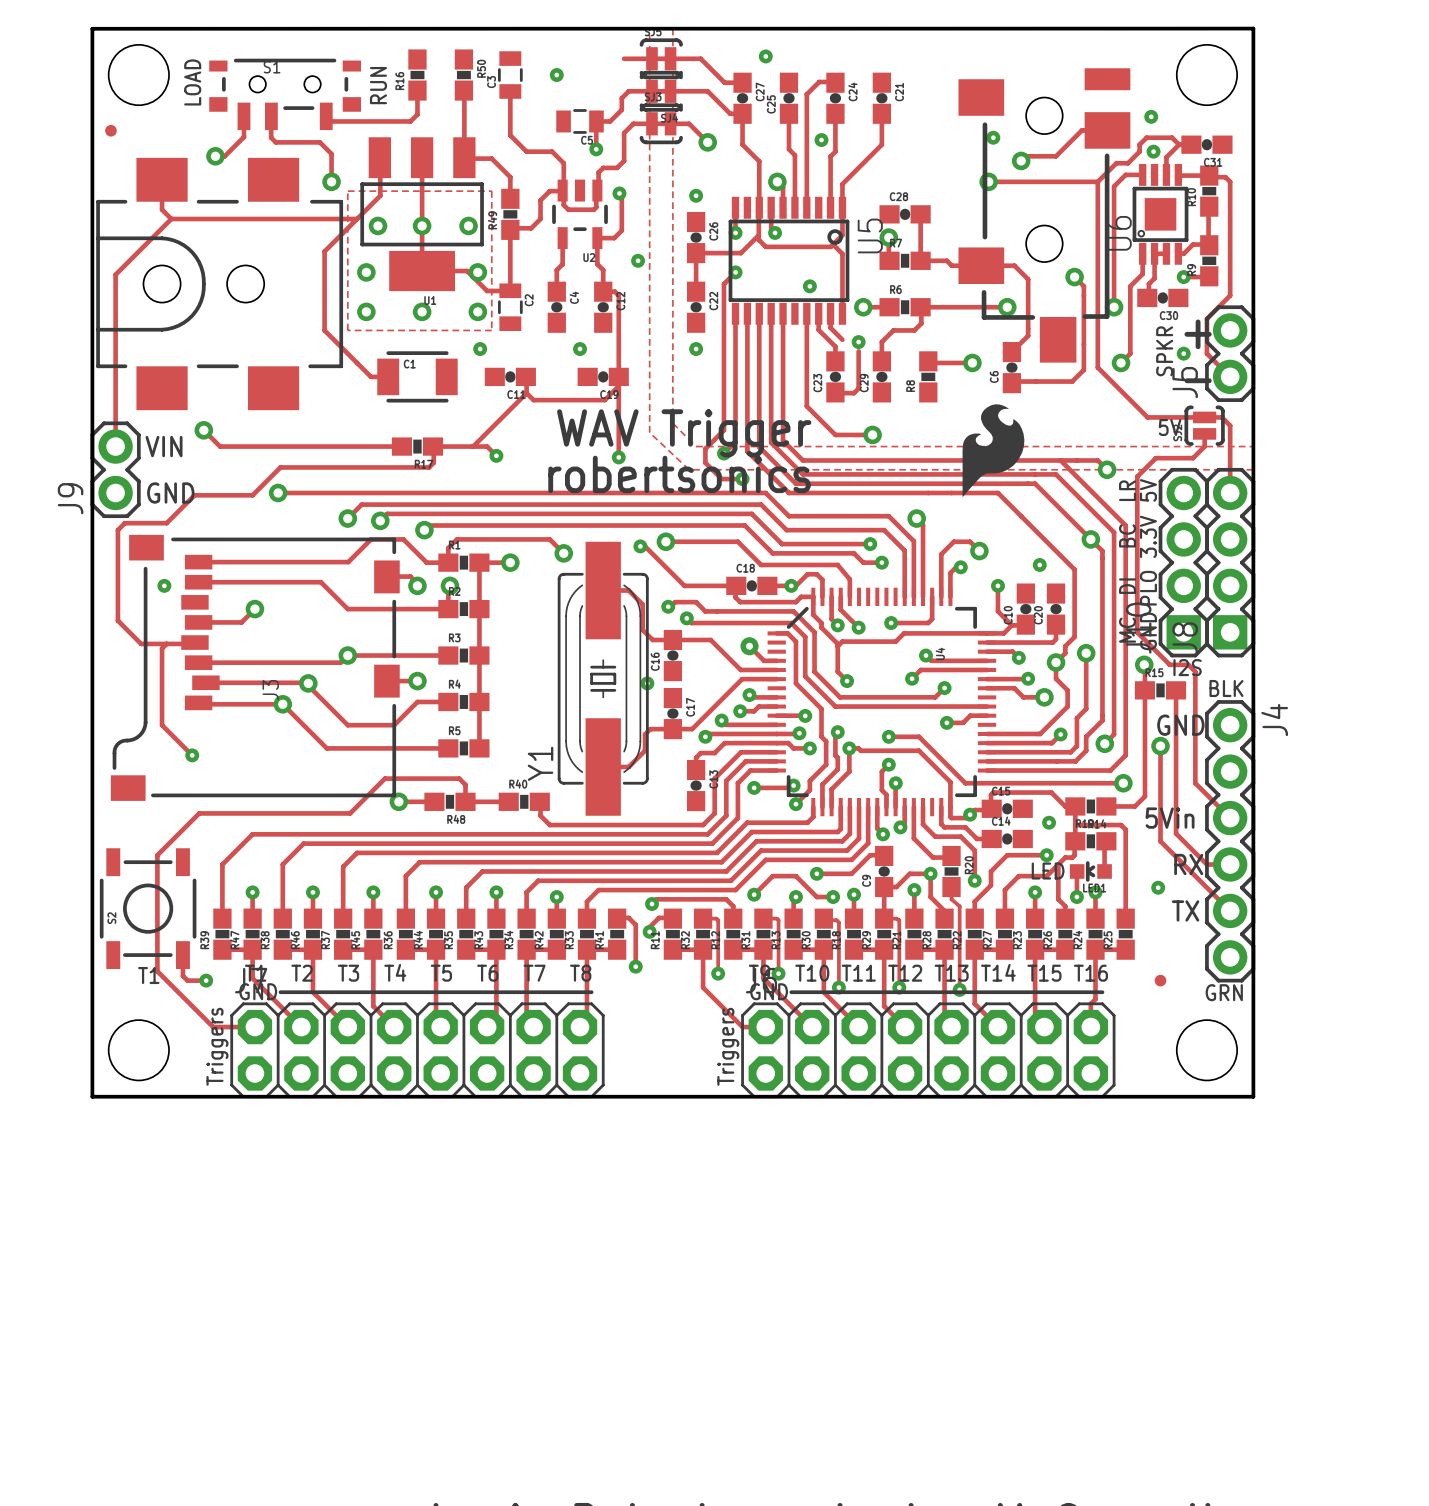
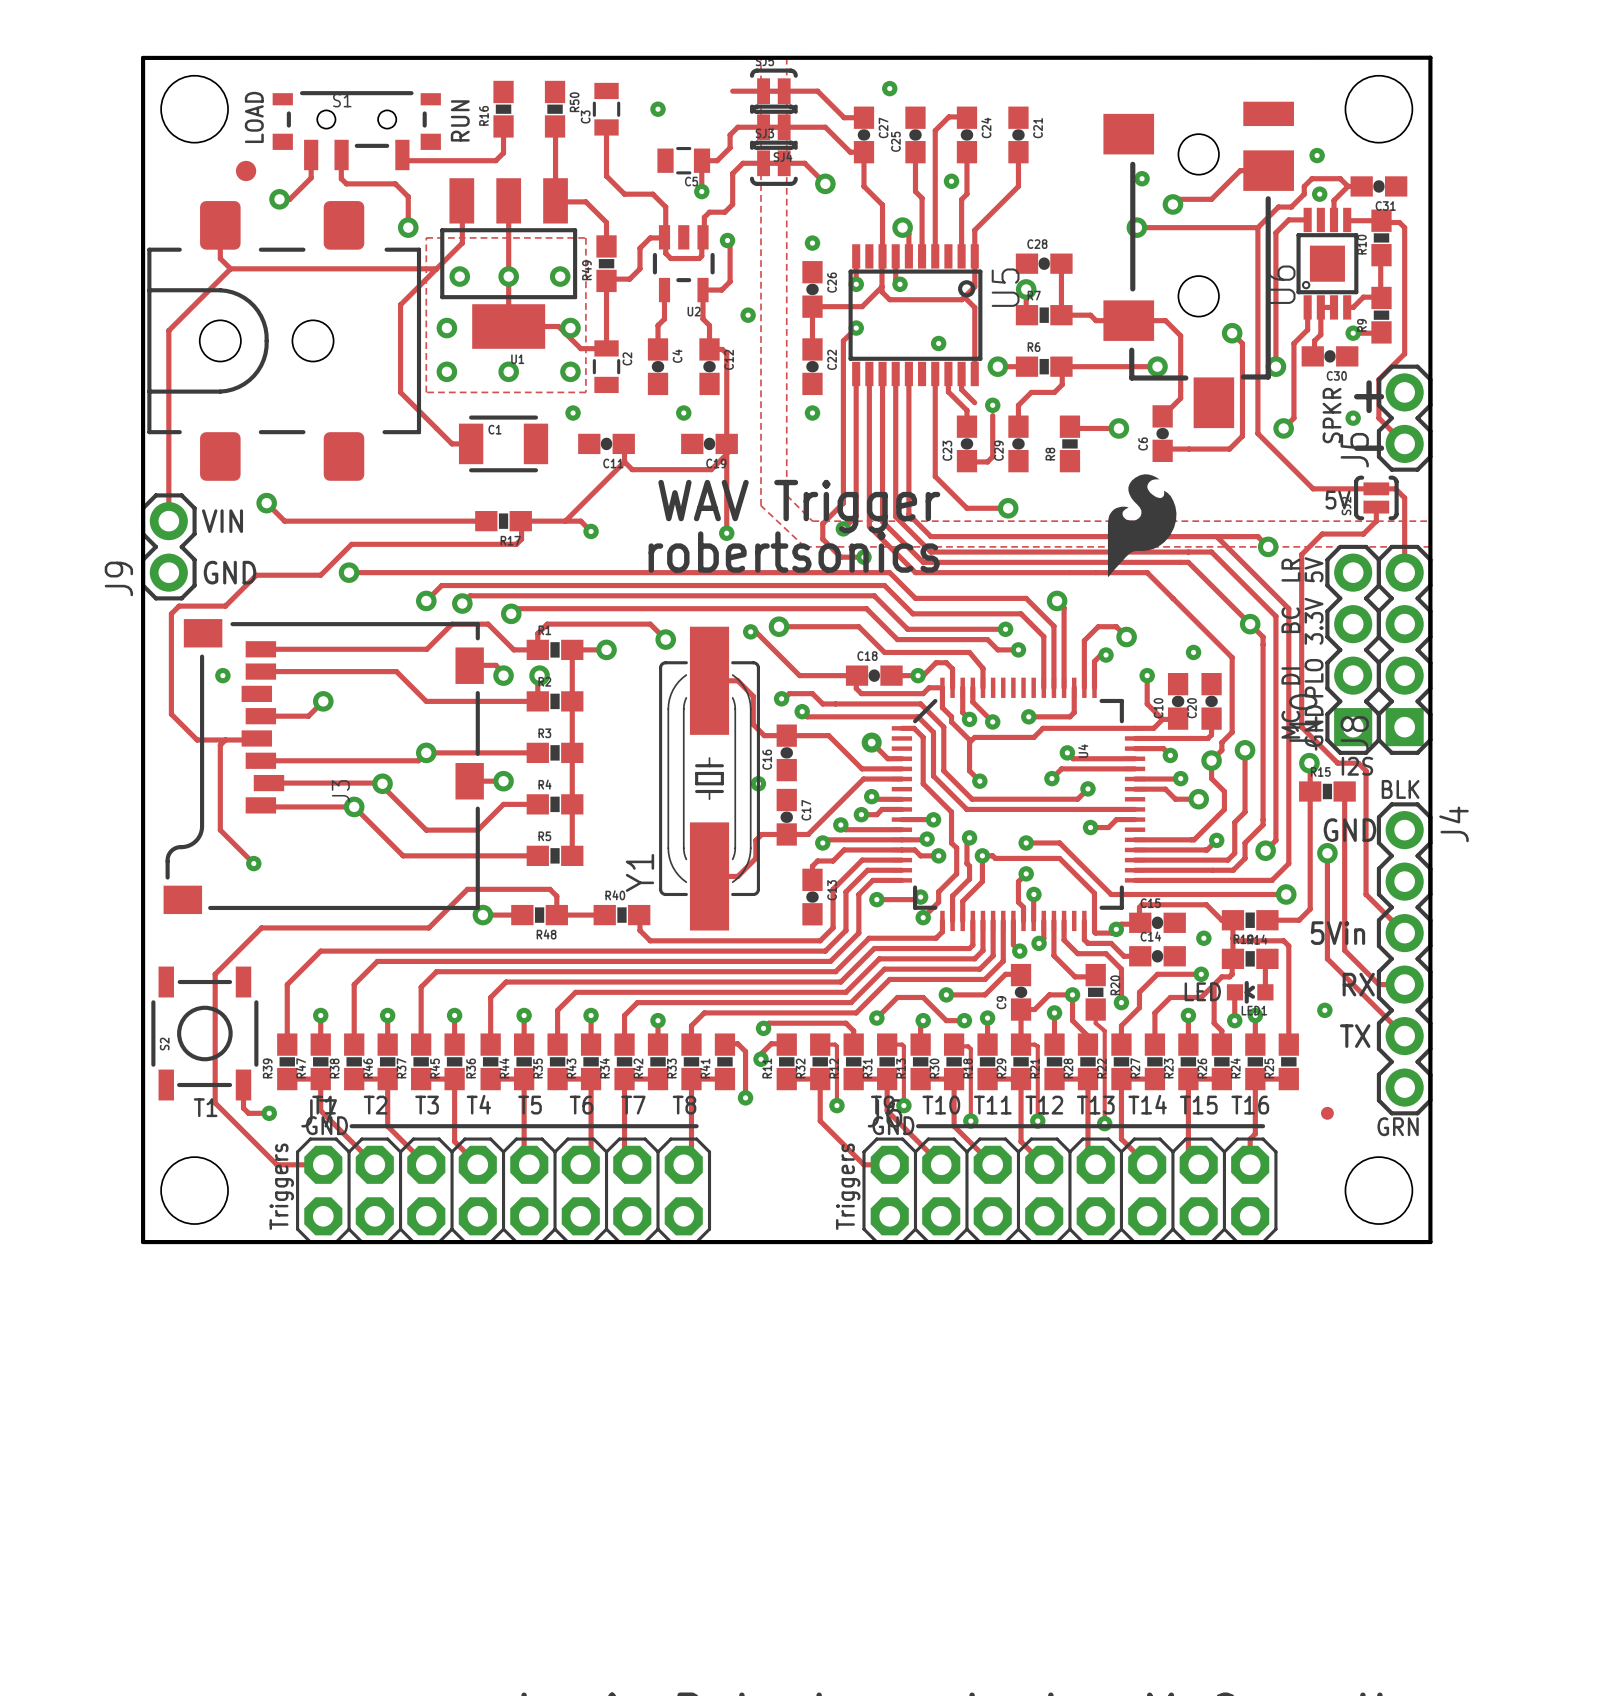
part: (110, 130) -> none
part: none -> (246, 171)
part footprint: [96, 157, 344, 411] -> [147, 201, 422, 481]

